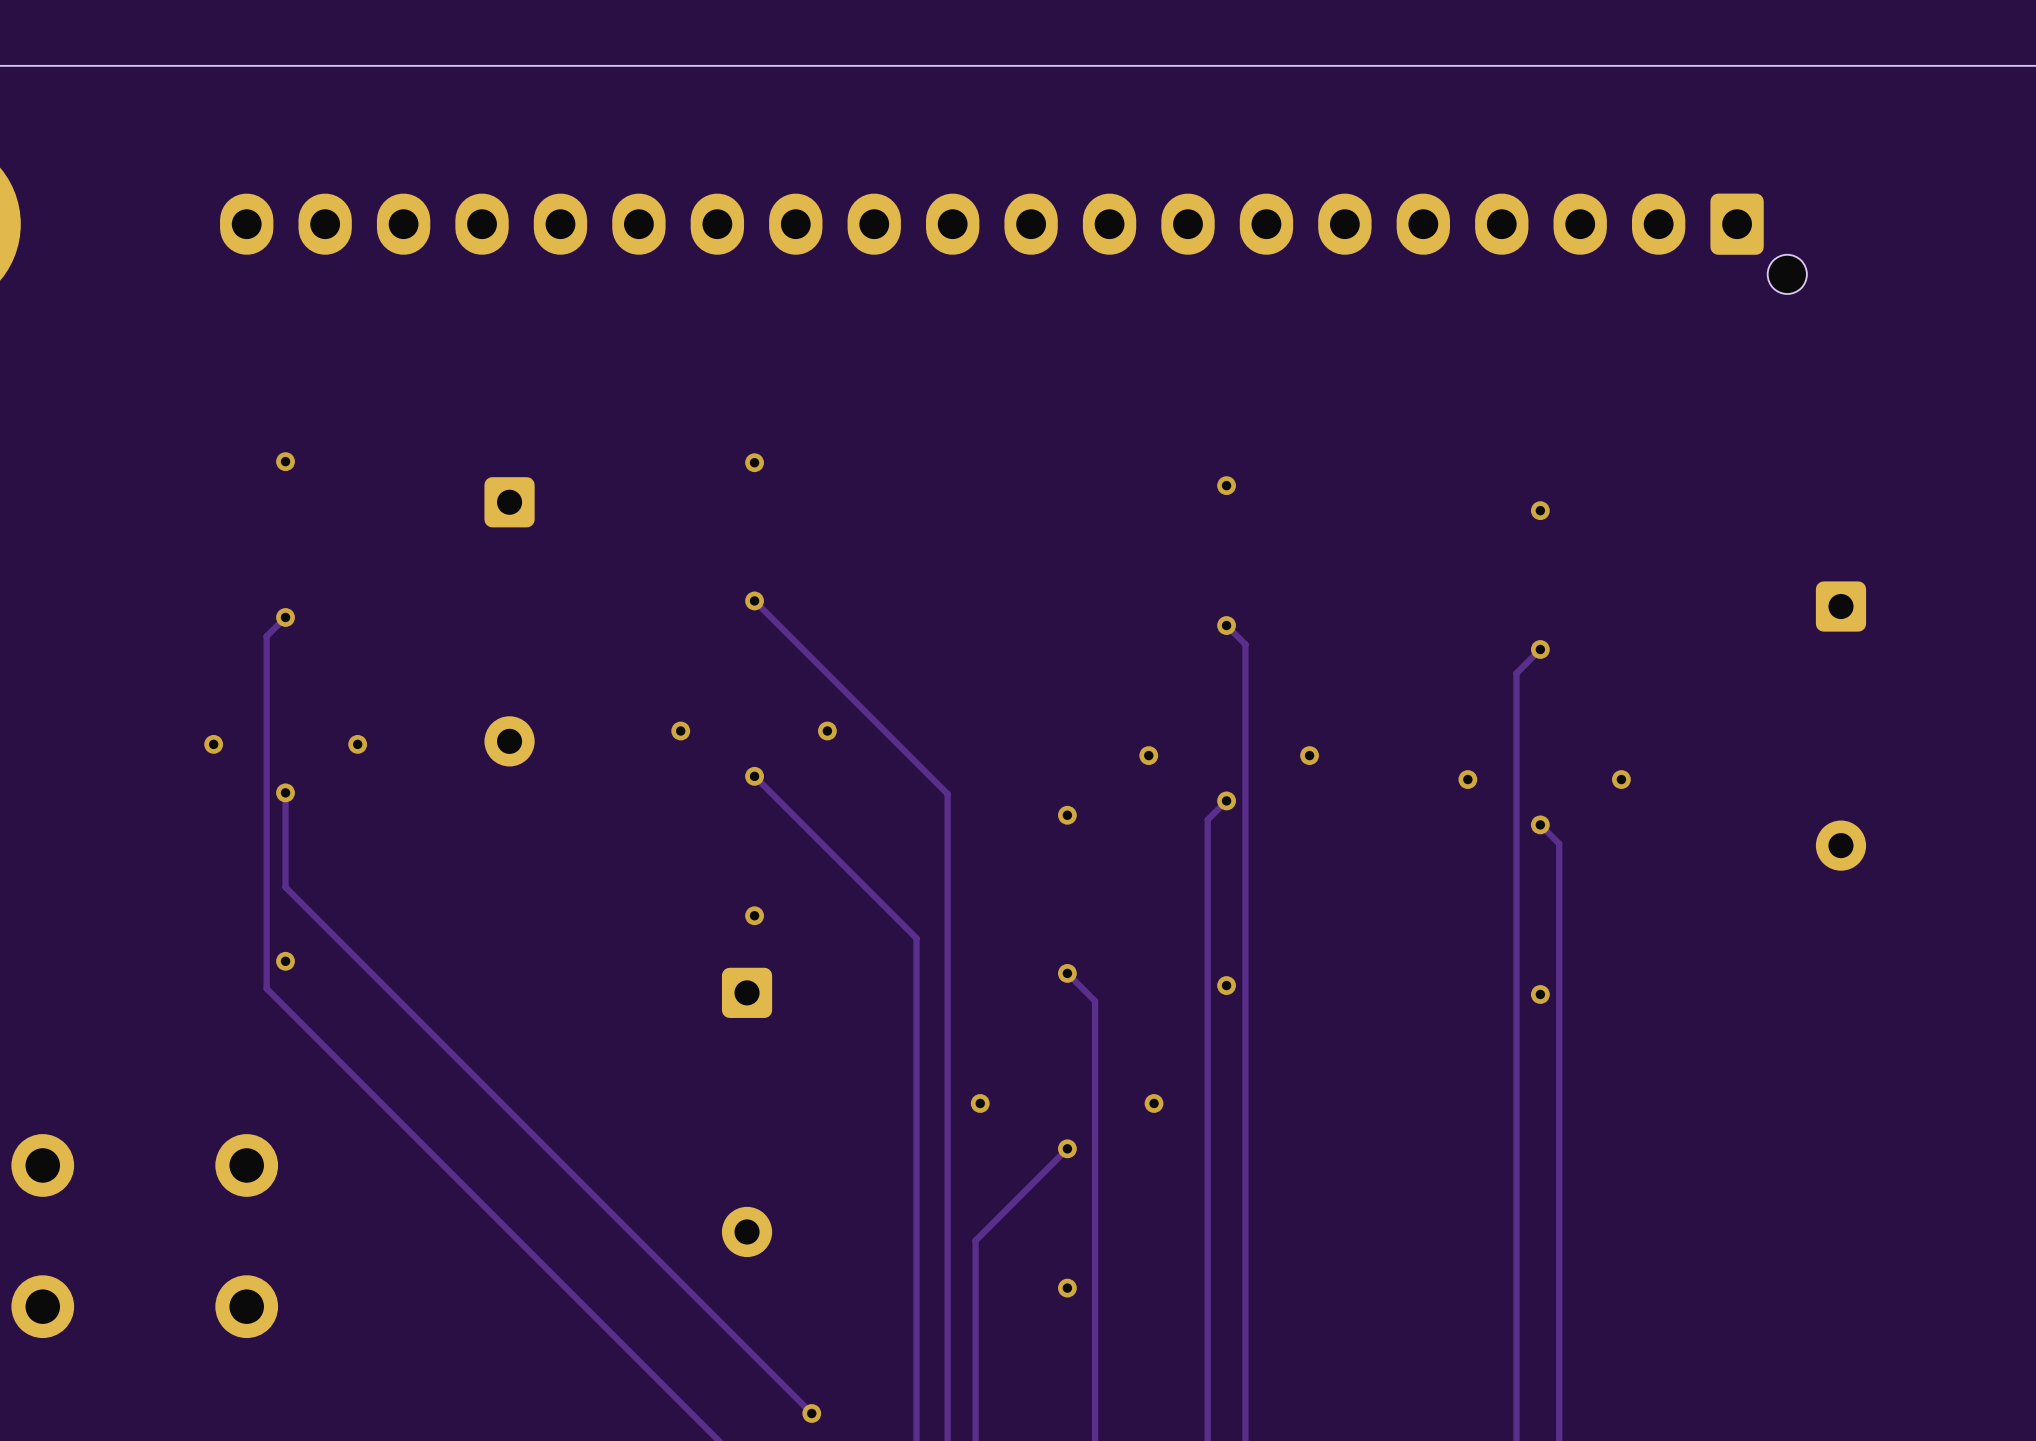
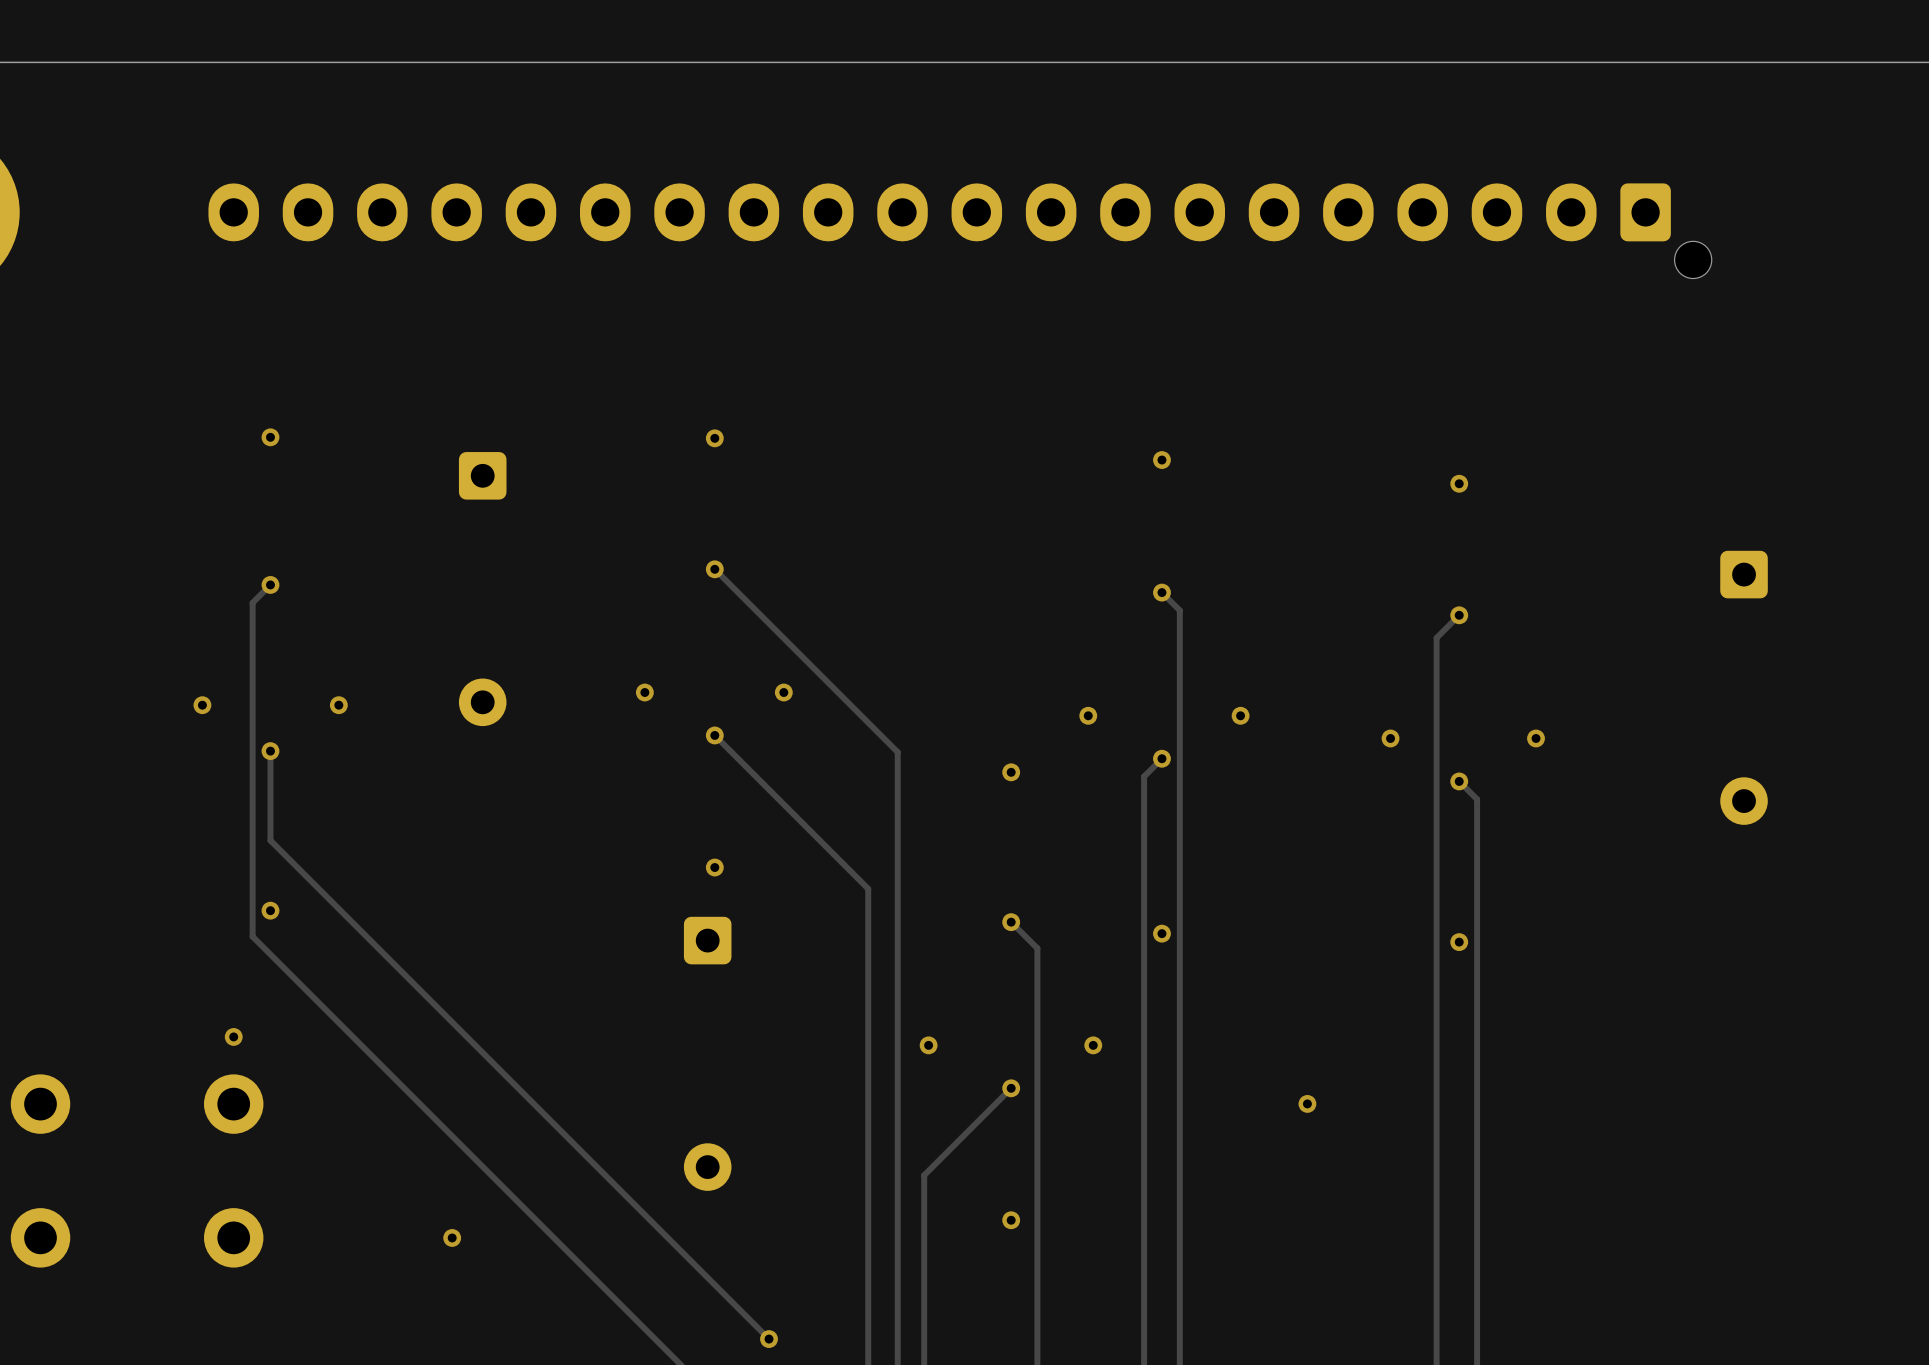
via: none -> (233, 1036)
via: none -> (1307, 1103)
via: none -> (452, 1237)

